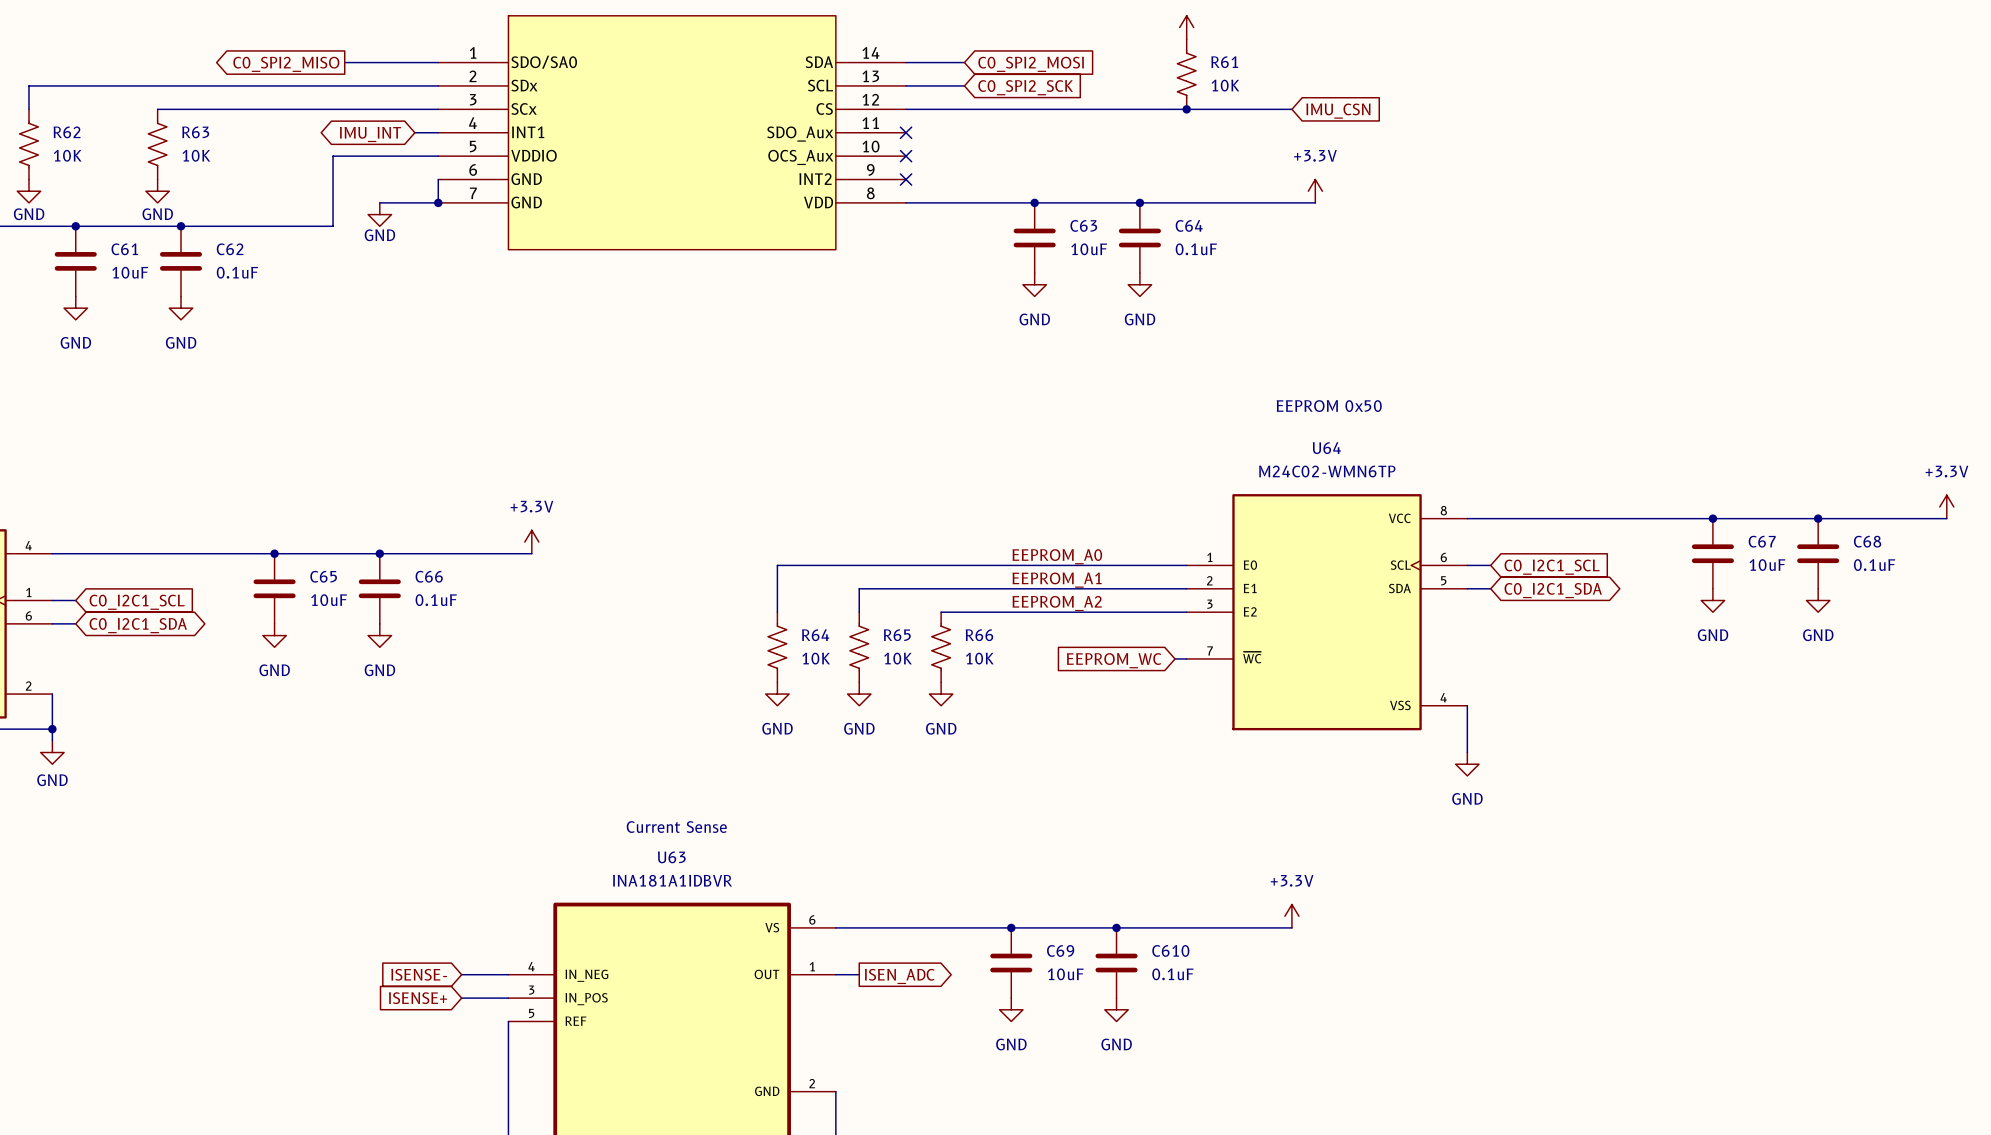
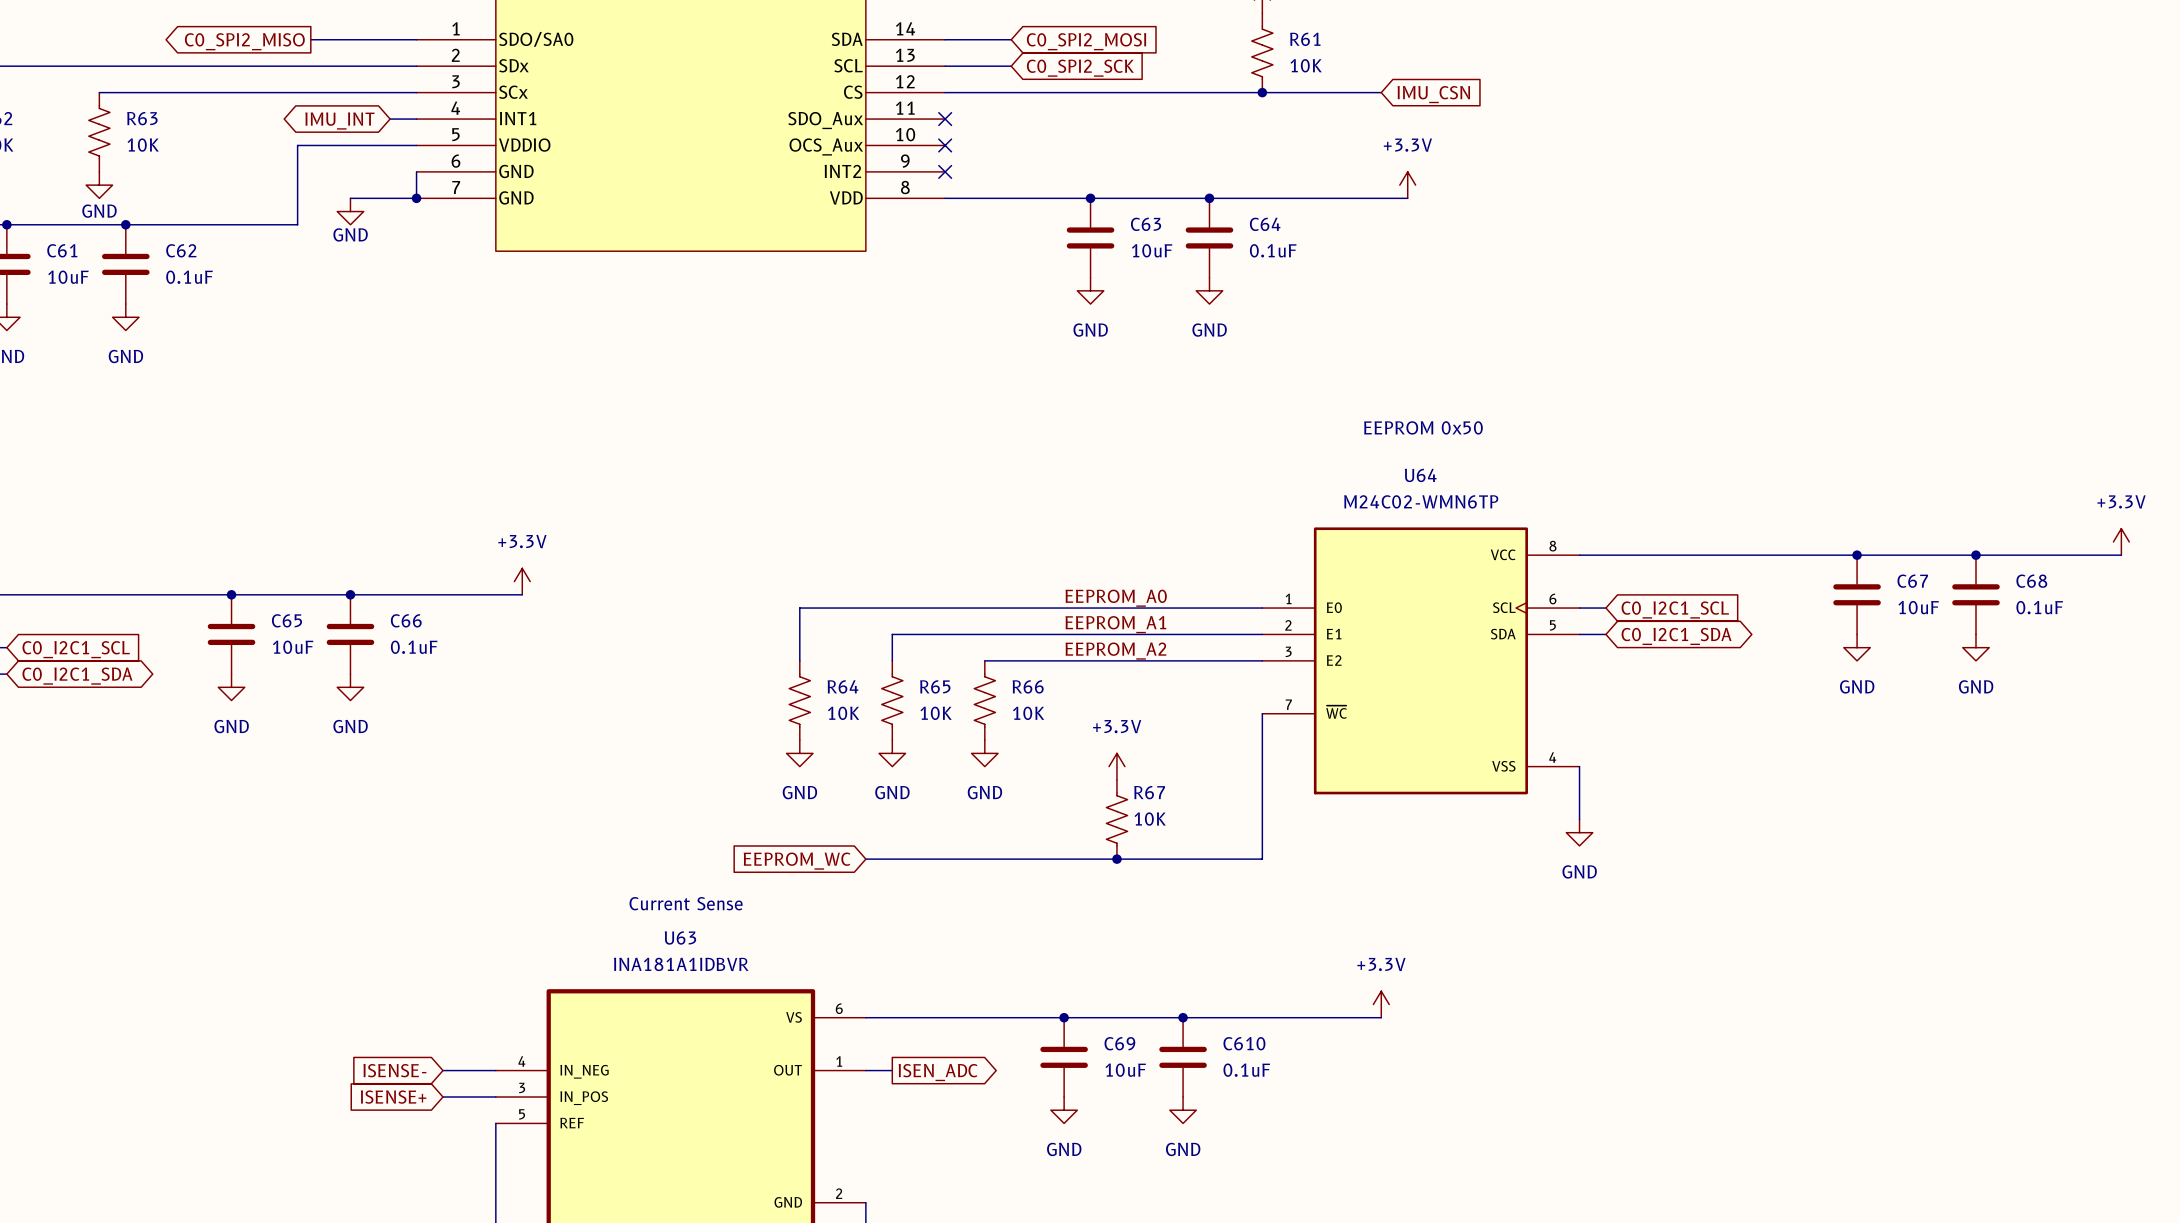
wire: (1174, 658) (1186, 658) -> (865, 859) (1262, 859) (1262, 713)
global label: EEPROM_WC (1114, 660) -> none
power symbol: none -> +3.3V (1116, 766)
R67: none -> 10K (1116, 819)
junction: none -> (1116, 859)
global label: none -> EEPROM_WC (797, 861)

